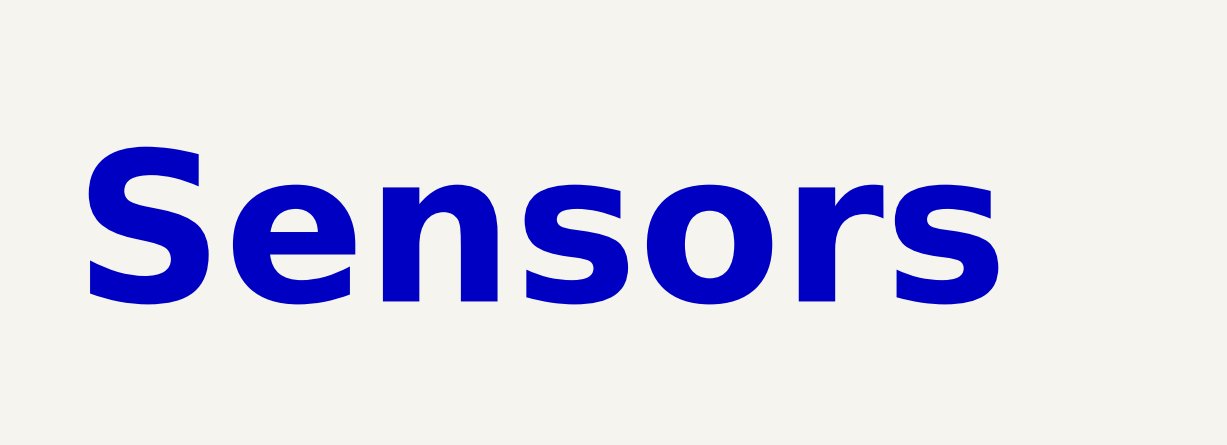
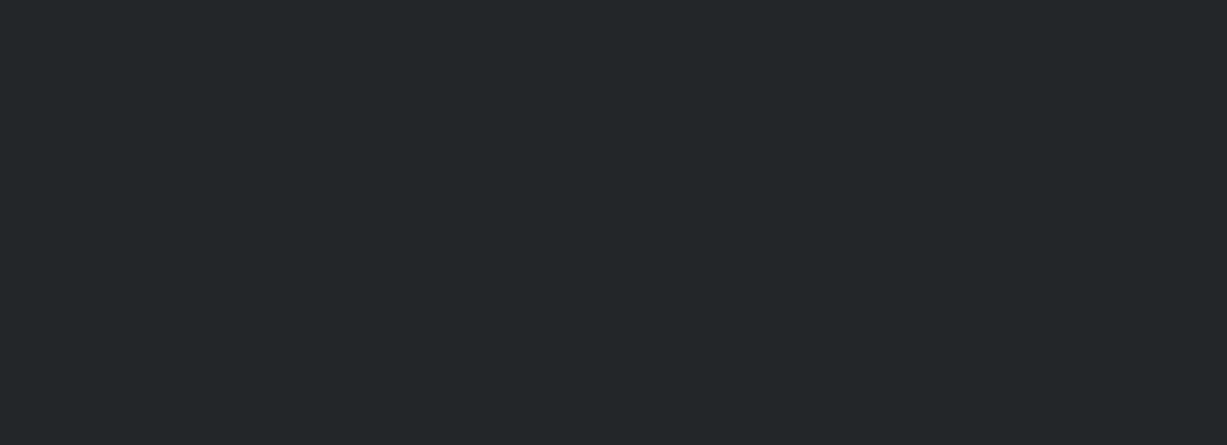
text: Sensors (543, 225) -> none

